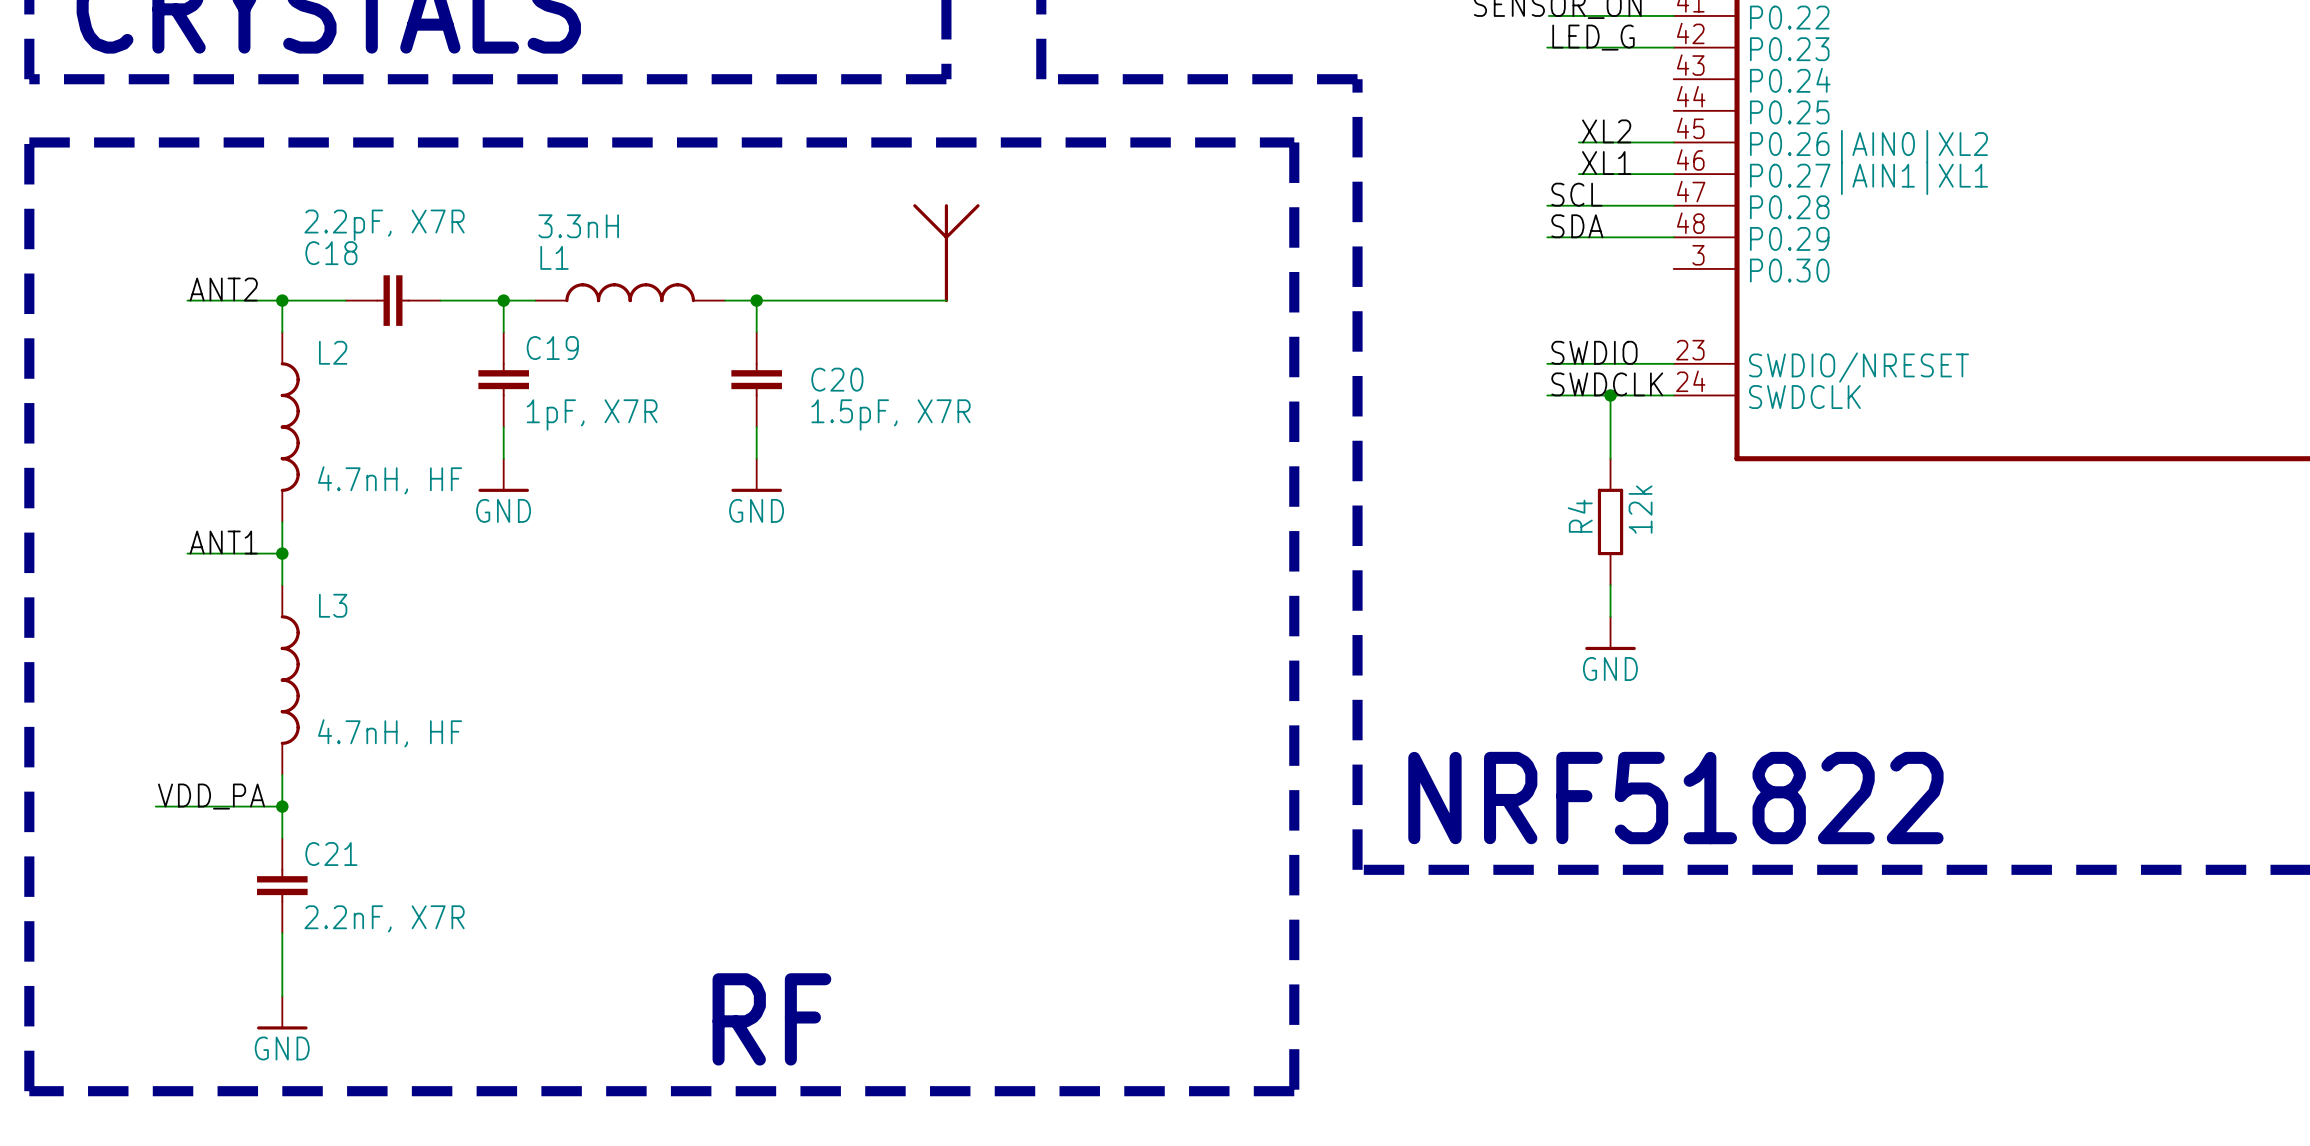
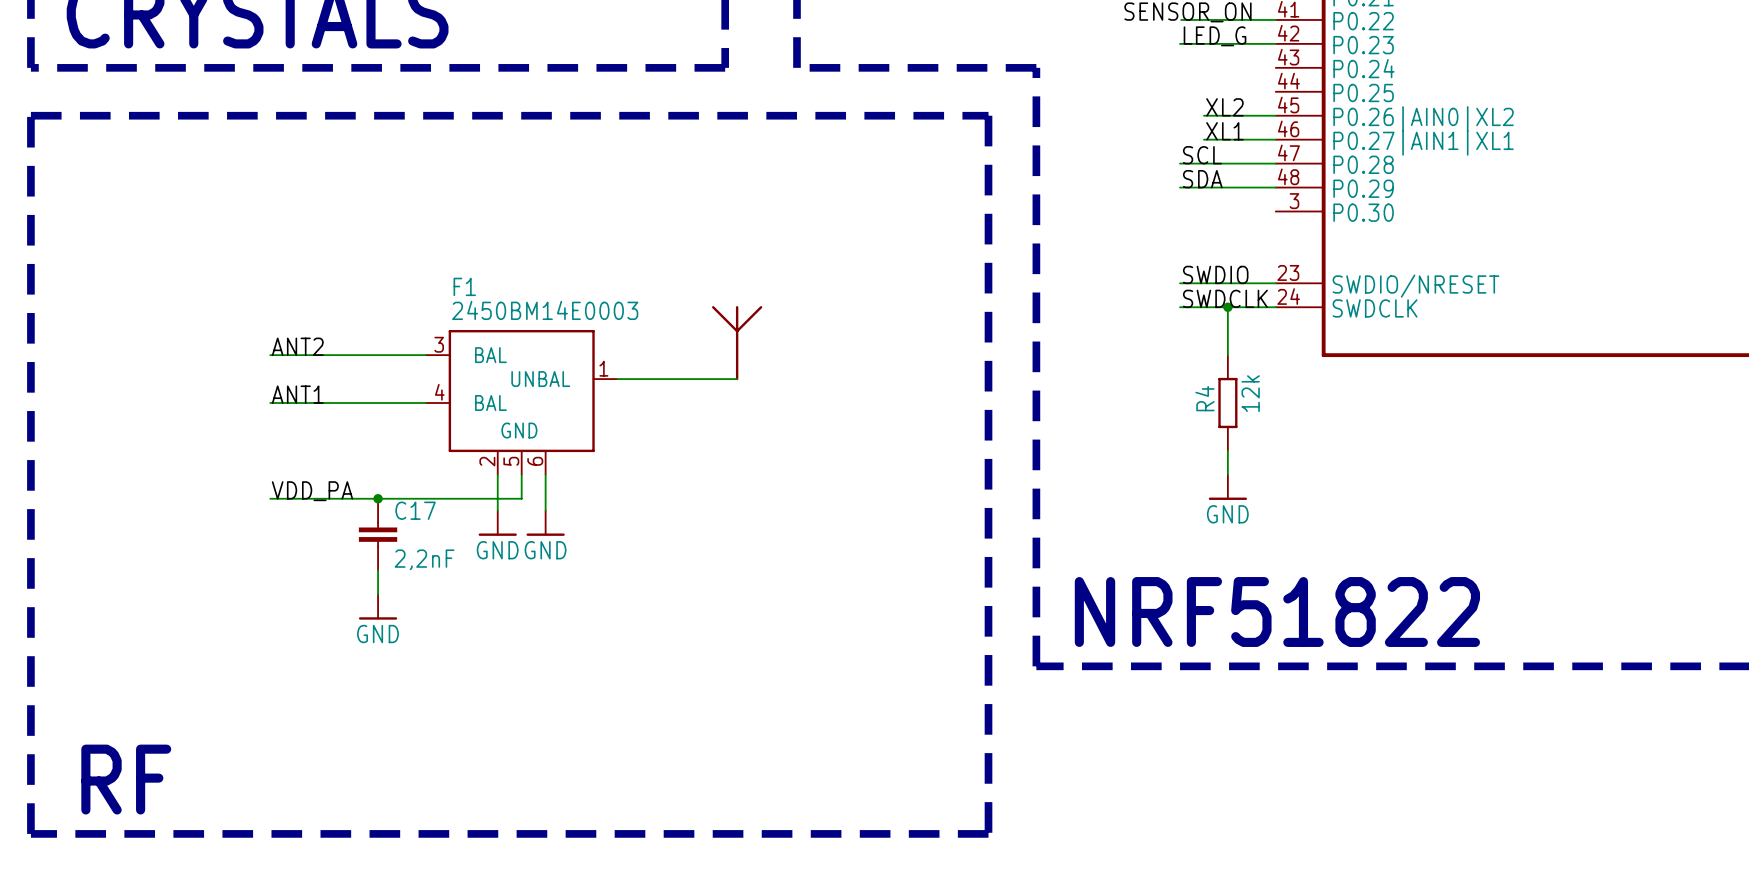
part position: (946, 253) -> (737, 343)
label position: ANT2 (223, 289) -> ANT2 (297, 346)
L1: 3.3nH (630, 292) -> none
wire: (187, 300) (345, 300) -> none
wire: (282, 300) (282, 332) -> none
junction: (282, 300) -> none
C18: 2.2pF, X7R (393, 300) -> none
wire: (440, 300) (535, 300) -> none
wire: (503, 300) (503, 332) -> none
junction: (503, 300) -> none
wire: (725, 300) (946, 300) -> none
wire: (756, 300) (756, 332) -> none
junction: (756, 300) -> none
C19: 1pF, X7R (503, 379) -> none
C20: 1.5pF, X7R (756, 379) -> none
L2: 4.7nH, HF (290, 427) -> none
wire: (503, 427) (503, 458) -> none
wire: (756, 427) (756, 458) -> none
wire: none -> (270, 355) (425, 355)
power symbol: GND (503, 475) -> none
power symbol: GND (756, 475) -> none
wire: none -> (617, 379) (737, 379)
wire: (282, 521) (282, 585) -> none
wire: none -> (270, 403) (425, 403)
F1: none -> 2450BM14E0003 (521, 402)
label position: ANT1 (223, 542) -> ANT1 (297, 394)
wire: (187, 553) (282, 553) -> none
junction: (282, 553) -> none
wire: none -> (497, 474) (497, 510)
wire: none -> (521, 474) (521, 498) (270, 498)
wire: none -> (545, 474) (545, 510)
junction: none -> (378, 498)
L3: 4.7nH, HF (290, 680) -> none
power symbol: none -> GND (497, 523)
power symbol: none -> GND (545, 523)
C17: none -> 2,2nF (378, 534)
wire: none -> (378, 570) (378, 594)
wire: (282, 774) (282, 838) -> none
power symbol: none -> GND (378, 607)
label position: VDD_PA (211, 796) -> VDD_PA (312, 491)
wire: (155, 806) (282, 806) -> none
junction: (282, 806) -> none
C21: 2.2nF, X7R (282, 885) -> none
wire: (282, 933) (282, 996) -> none
power symbol: GND (282, 1012) -> none
text: none -> RF (126, 779)
text: RF (771, 1019) -> none

